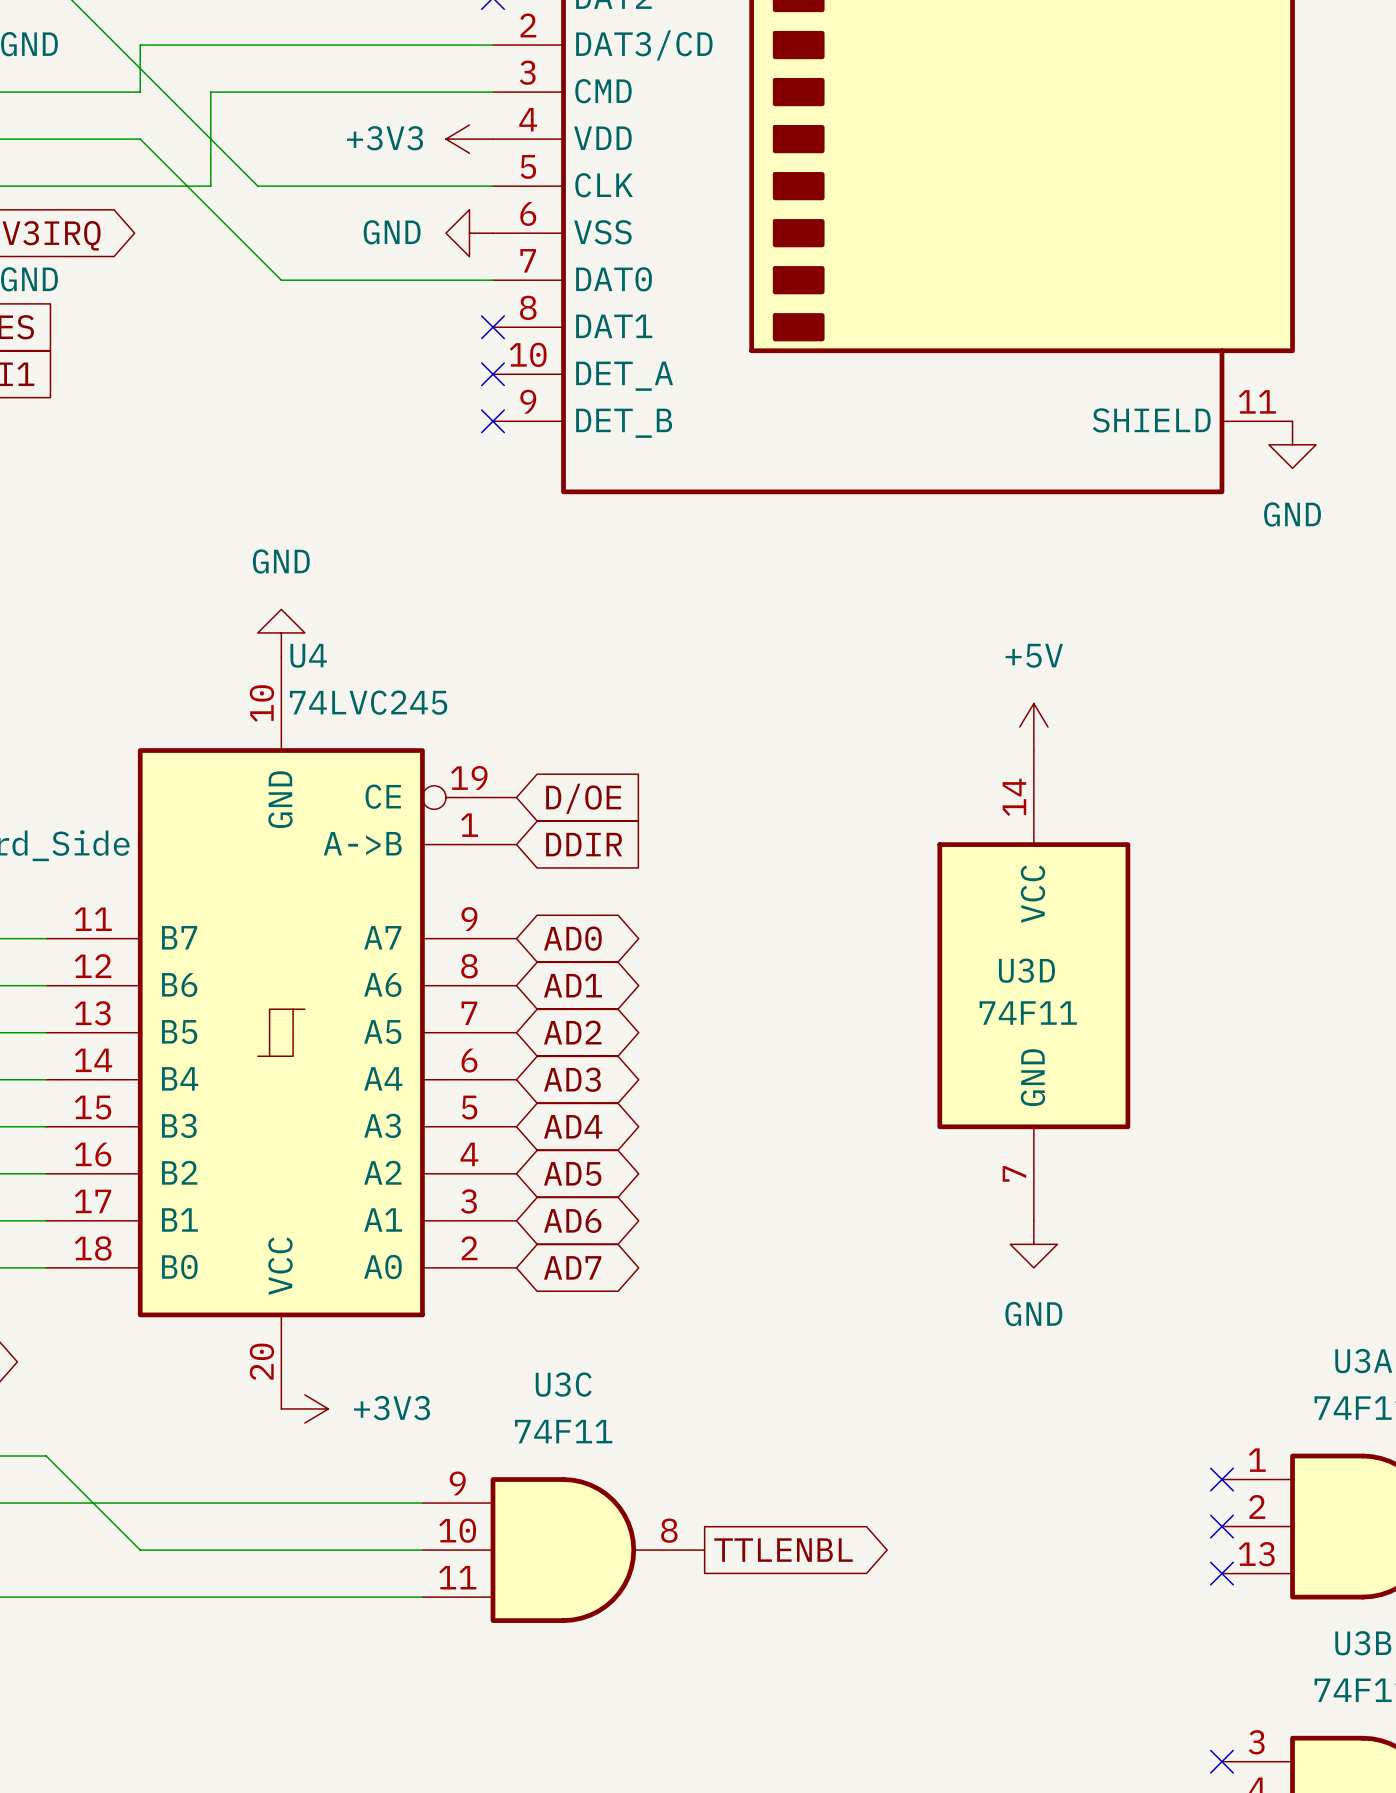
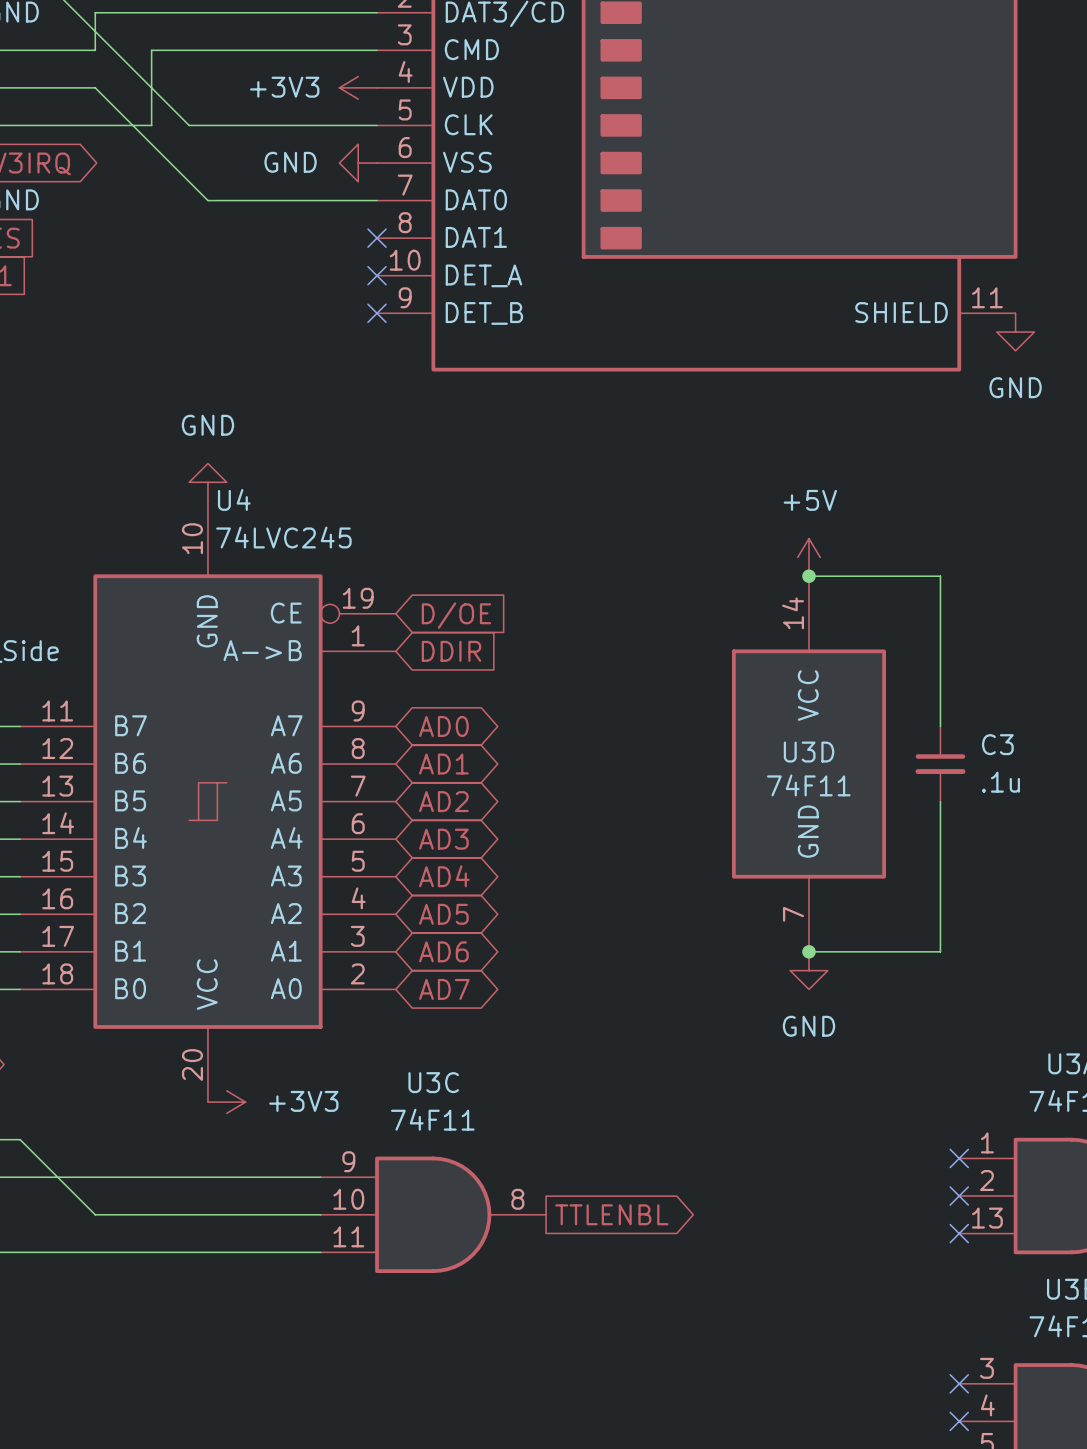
wire: none -> (808, 576) (940, 576) (940, 726)
junction: none -> (808, 576)
C3: none -> .1u (940, 764)
wire: none -> (940, 801) (940, 951) (808, 951)
junction: none -> (808, 951)

